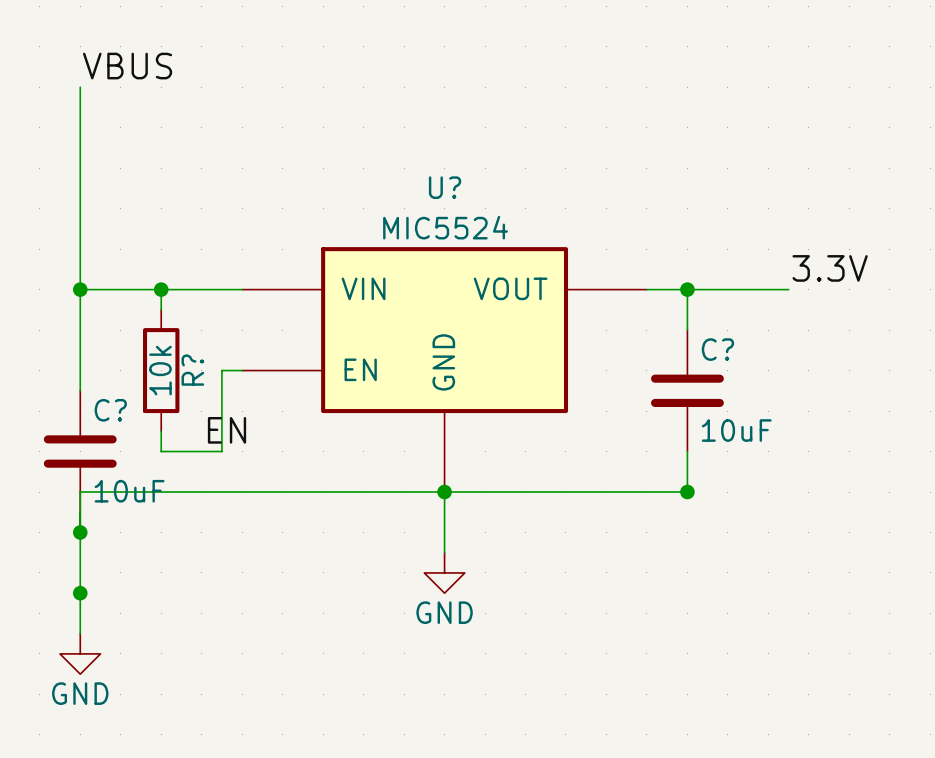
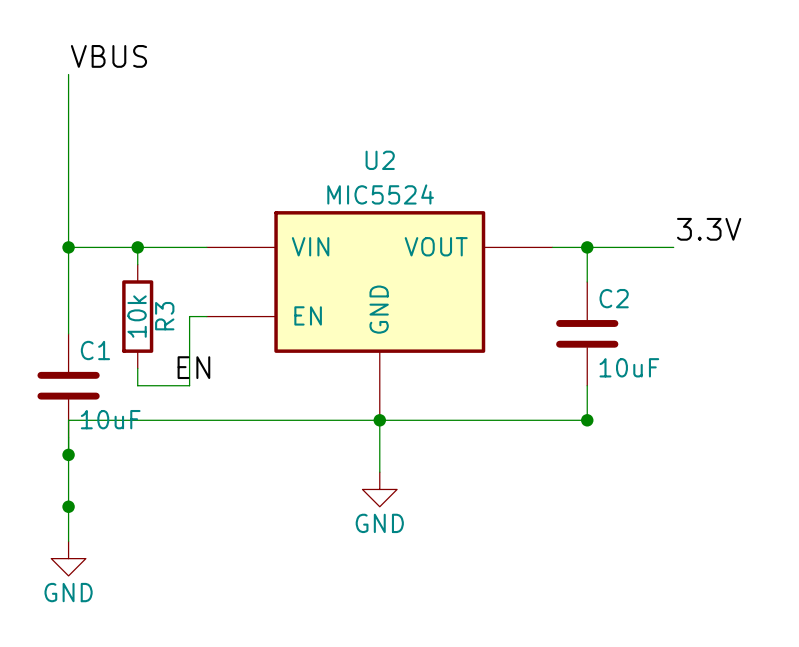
U? name: U? (445, 187) -> U2 (380, 160)
C? name: C? (717, 349) -> C2 (614, 298)
R? name: R? (192, 370) -> R3 (164, 316)
C? name: C? (110, 410) -> C1 (95, 350)

